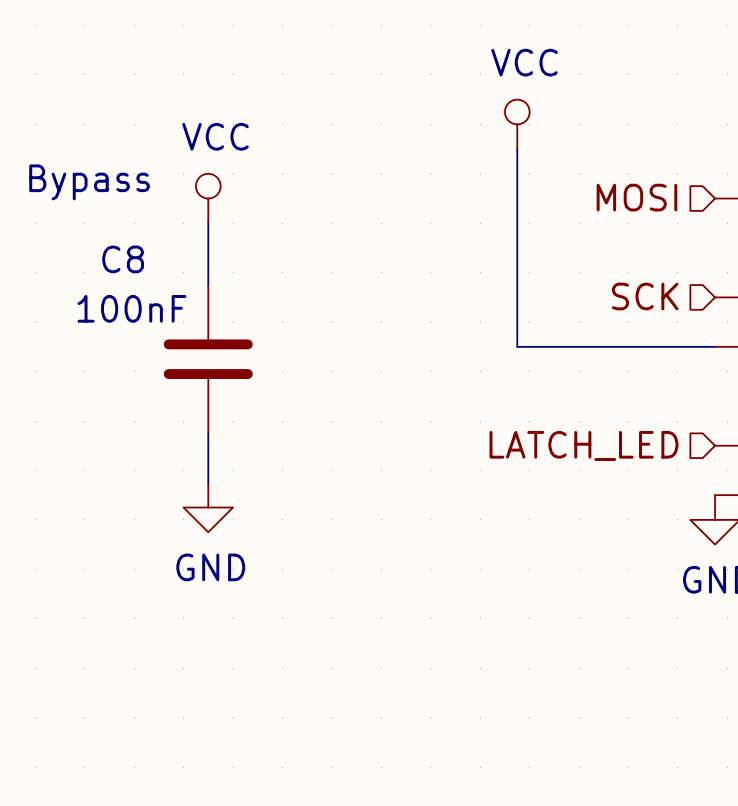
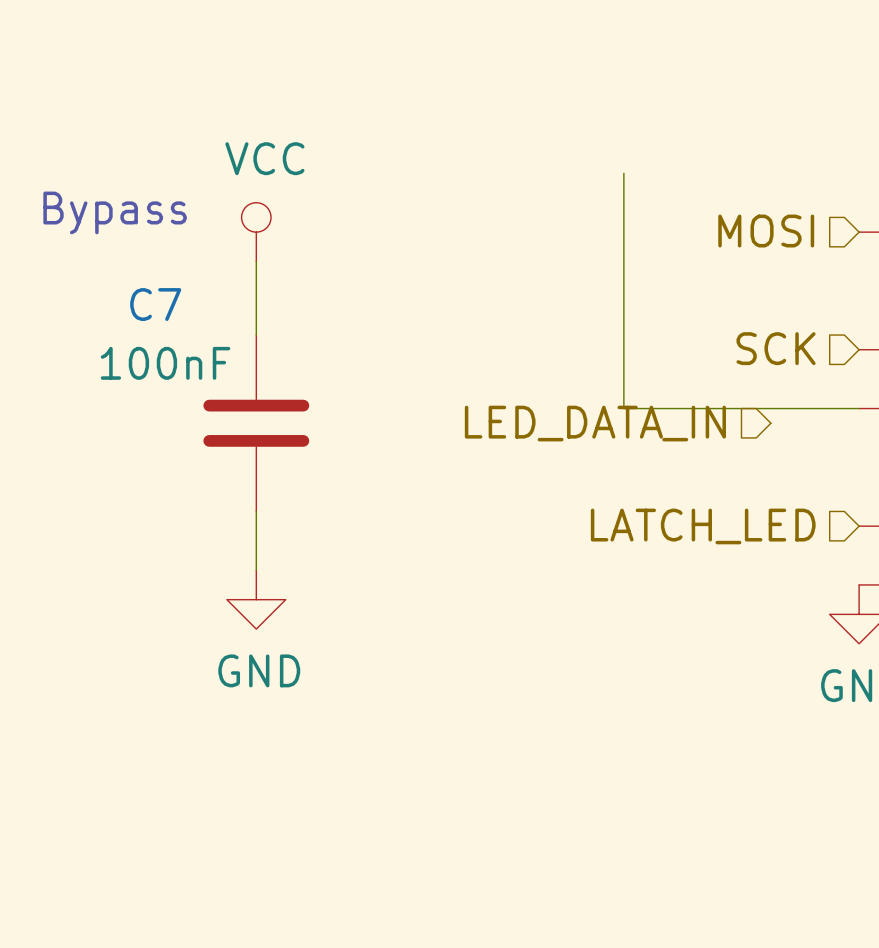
power symbol: VCC (517, 124) -> none
C8 name: C8 (123, 259) -> C7 (155, 304)
hierarchical label: none -> LED_DATA_IN (595, 423)

